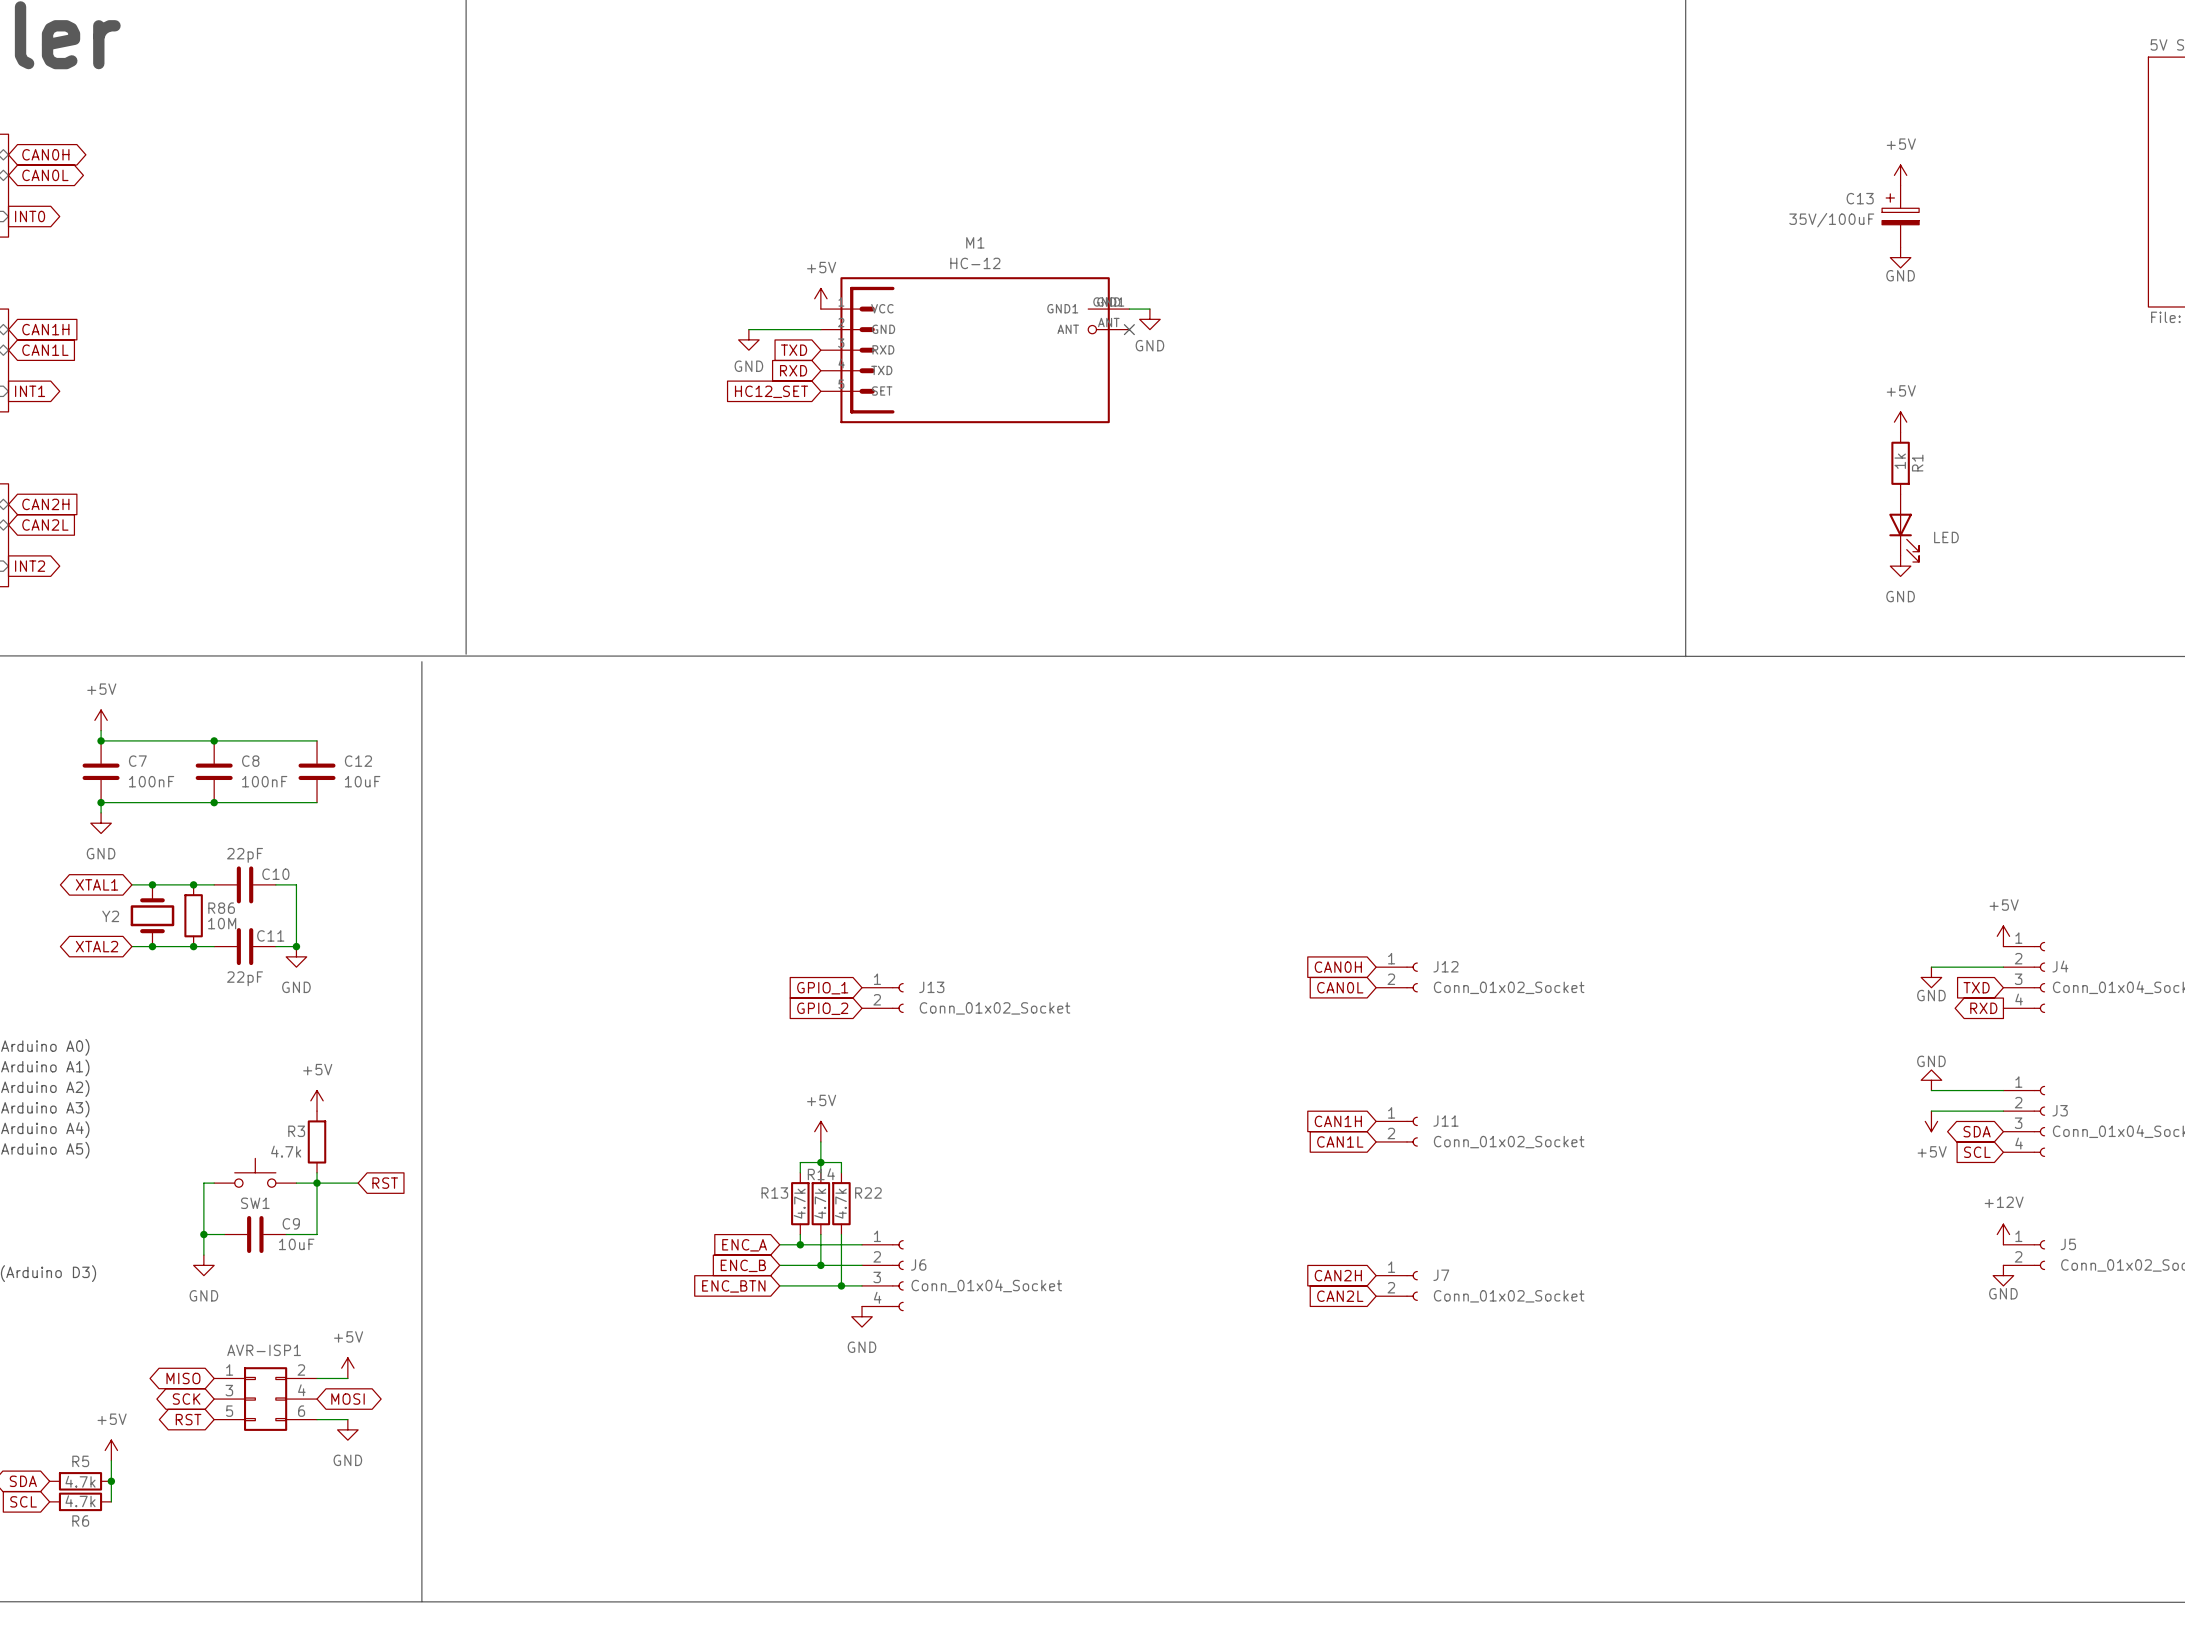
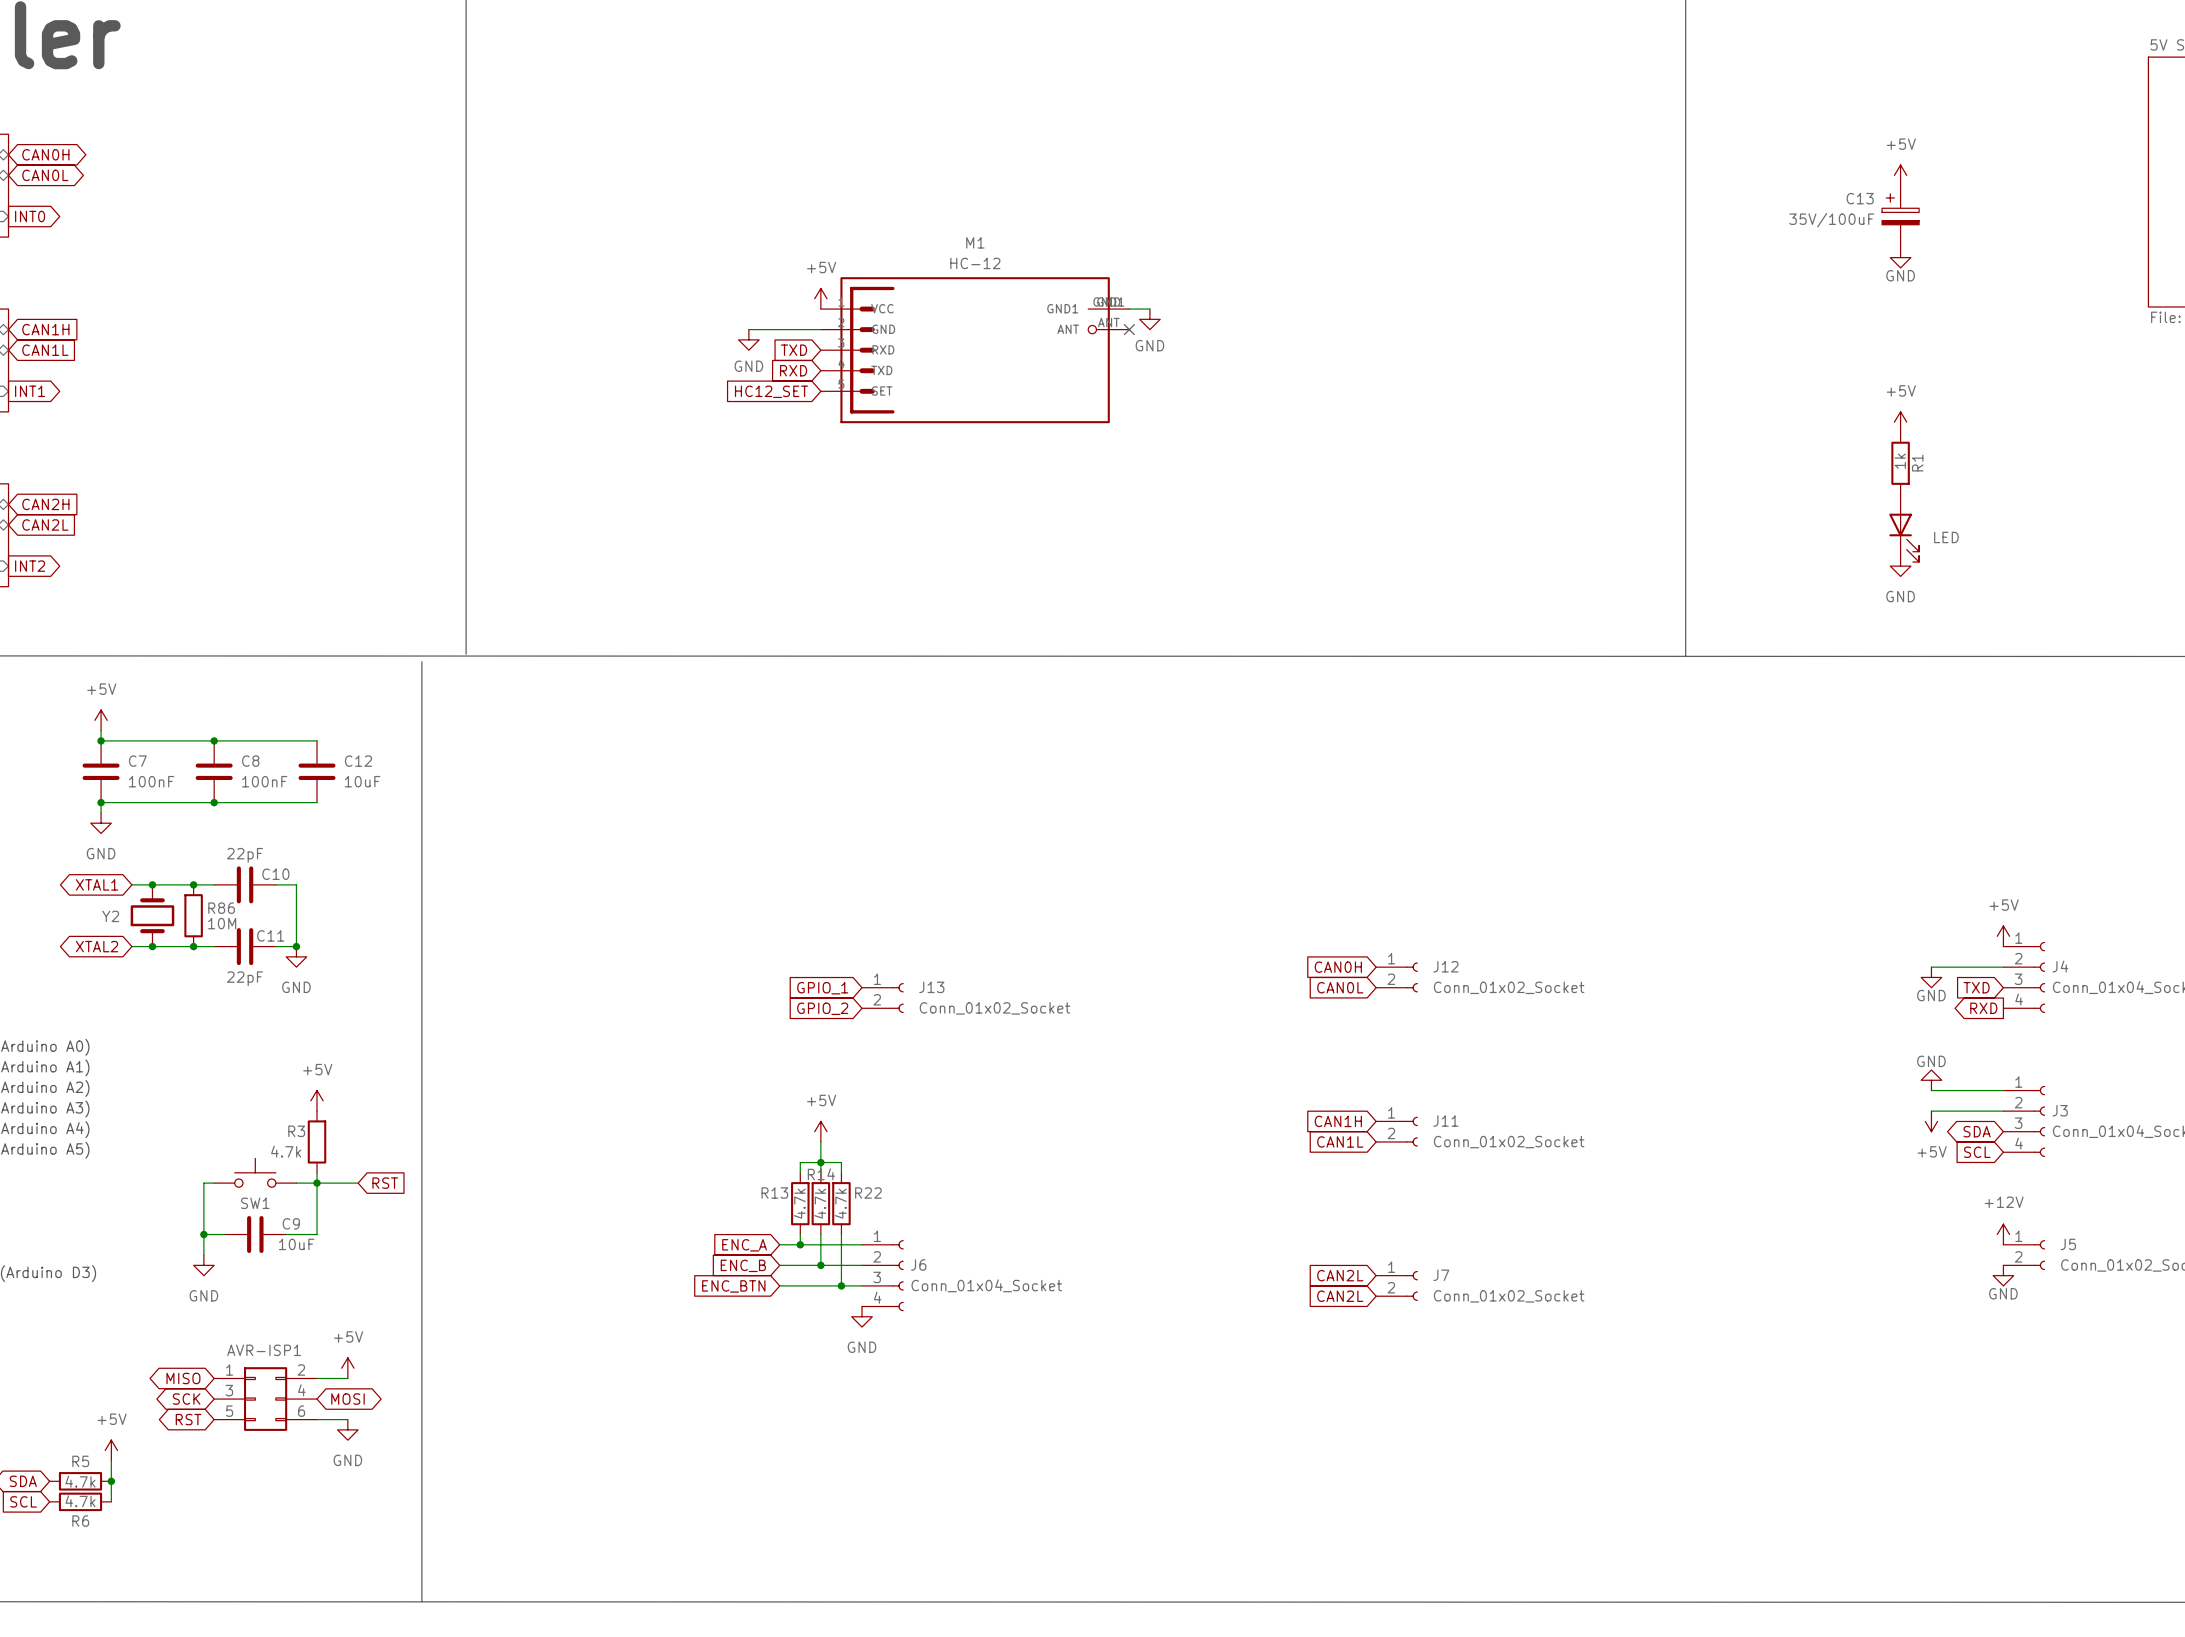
global label: CAN2H (1338, 1275) -> CAN2L (1340, 1275)

